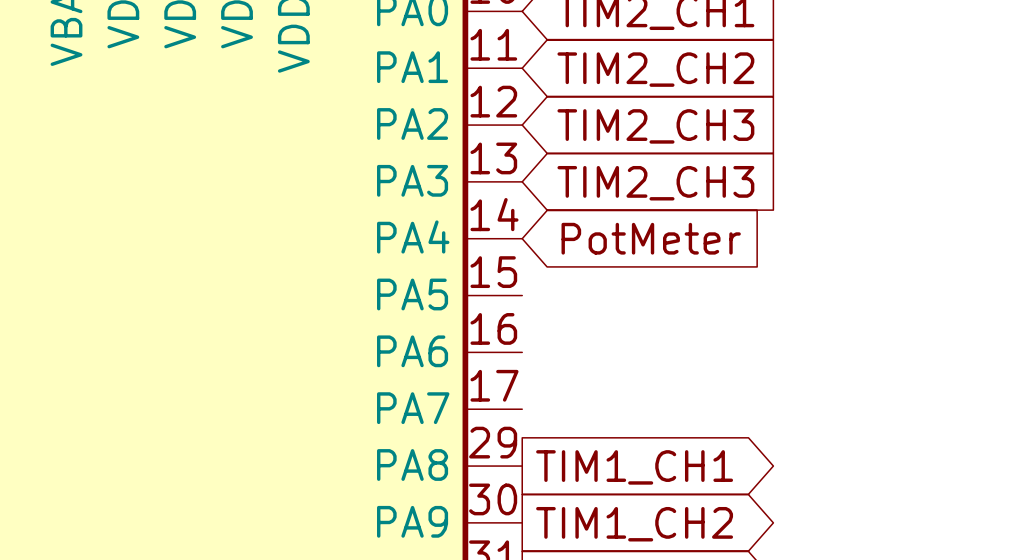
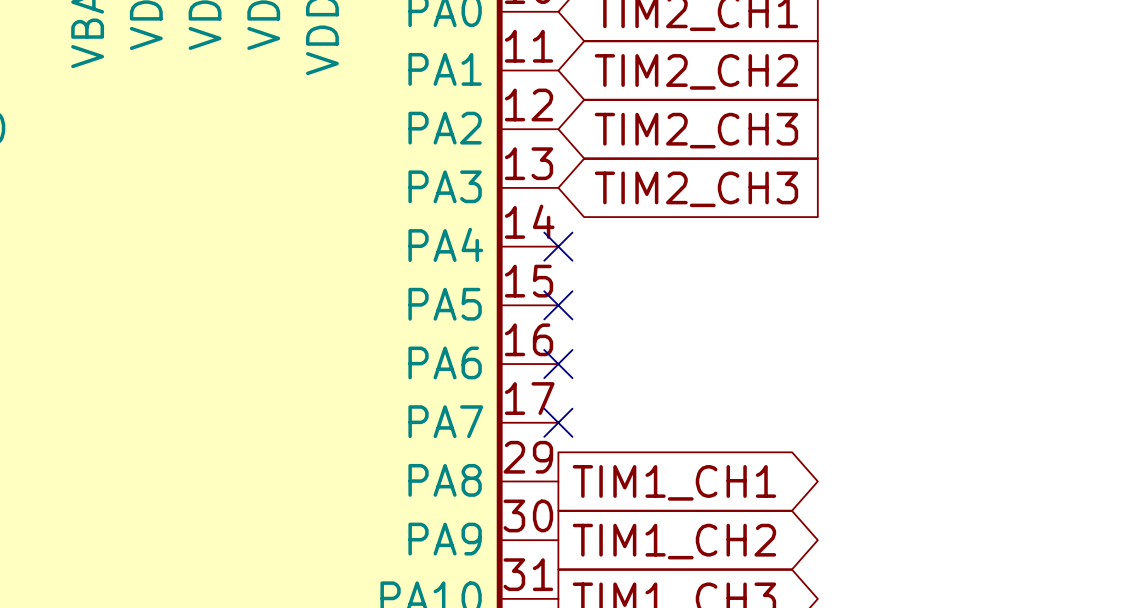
no-connect mark: none -> (558, 246)
global label: PotMeter (651, 238) -> none
no-connect mark: none -> (558, 305)
no-connect mark: none -> (558, 364)
no-connect mark: none -> (558, 422)

